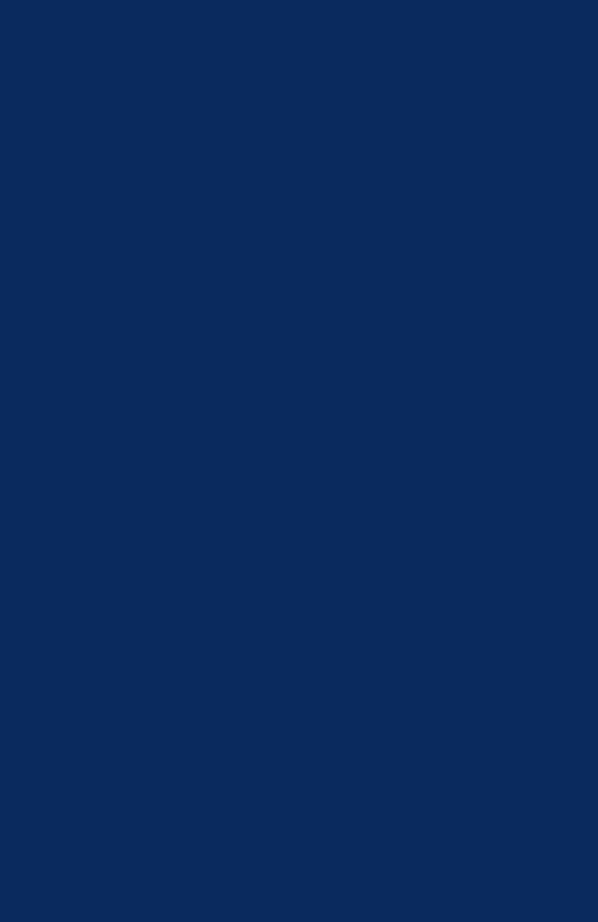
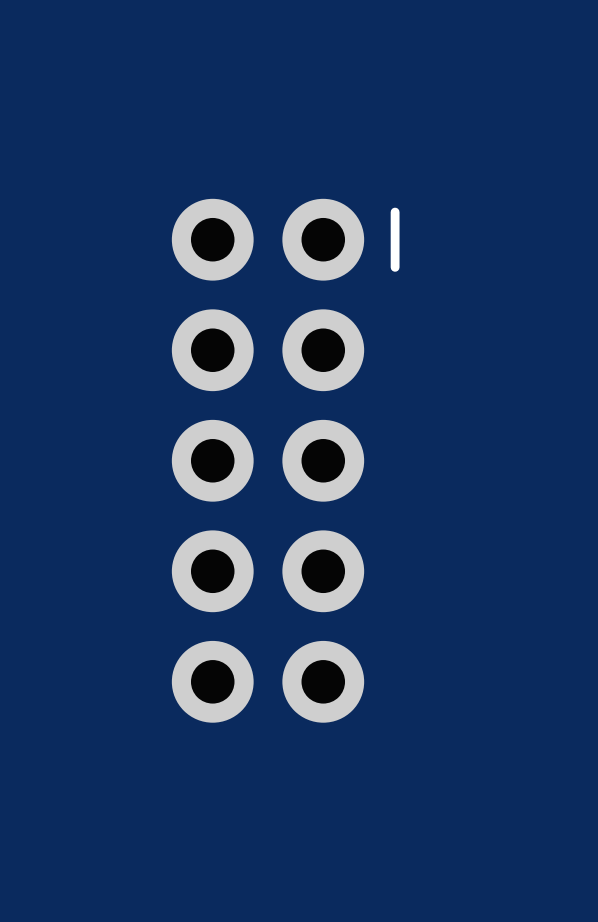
part: none -> (285, 460)

